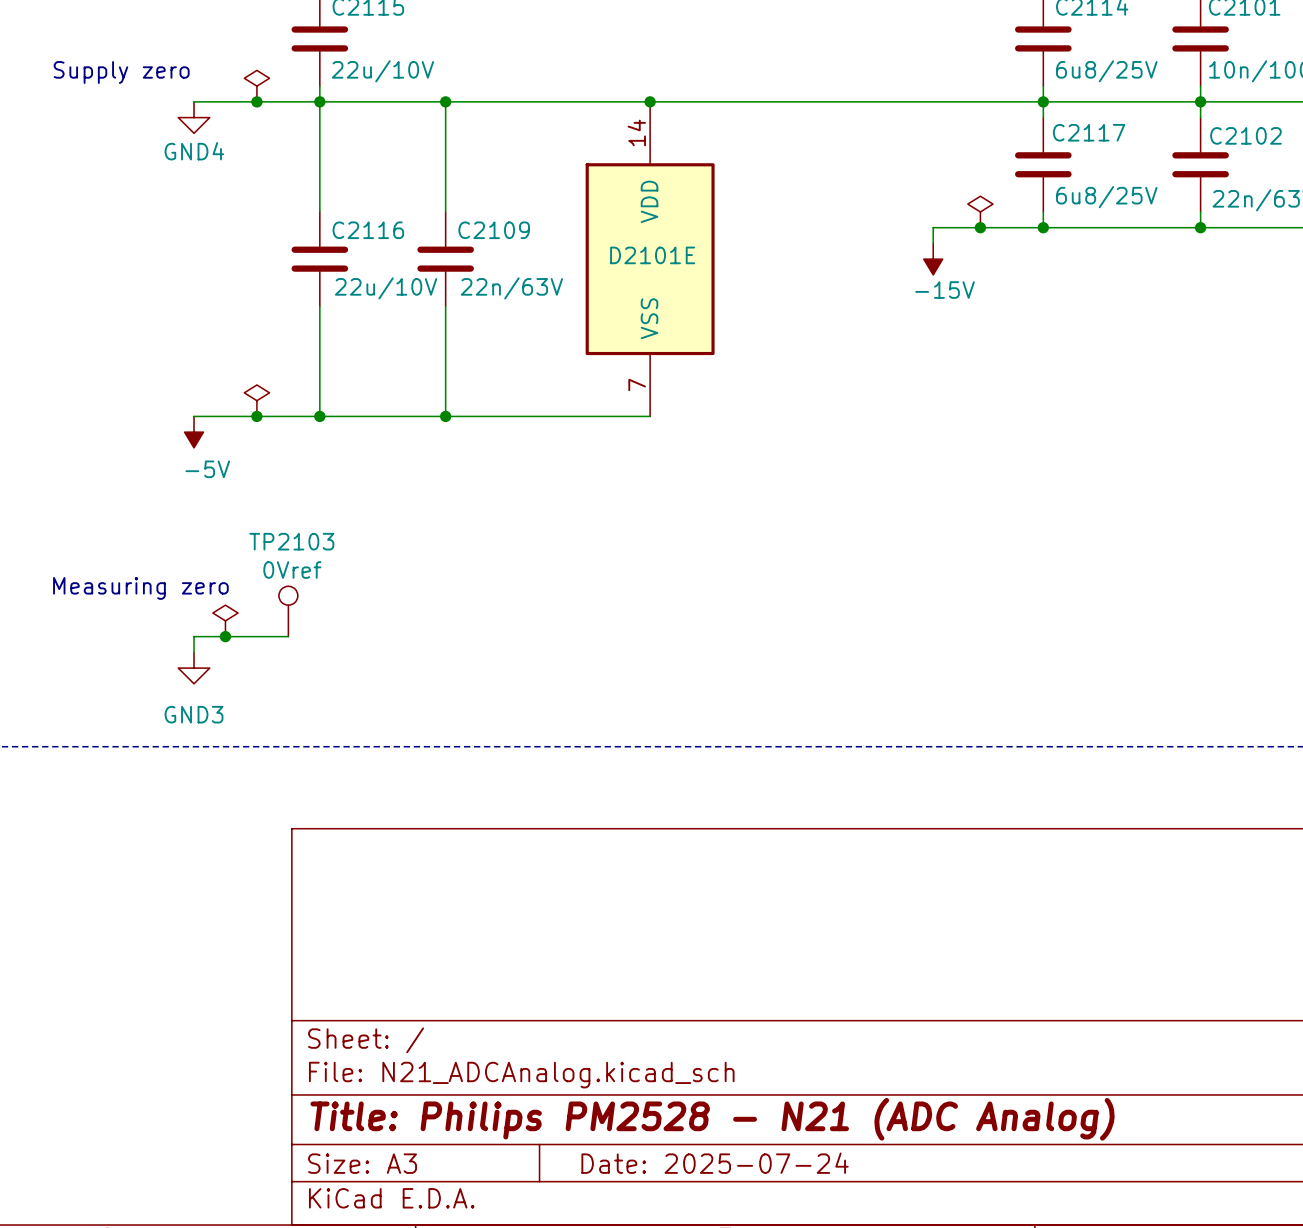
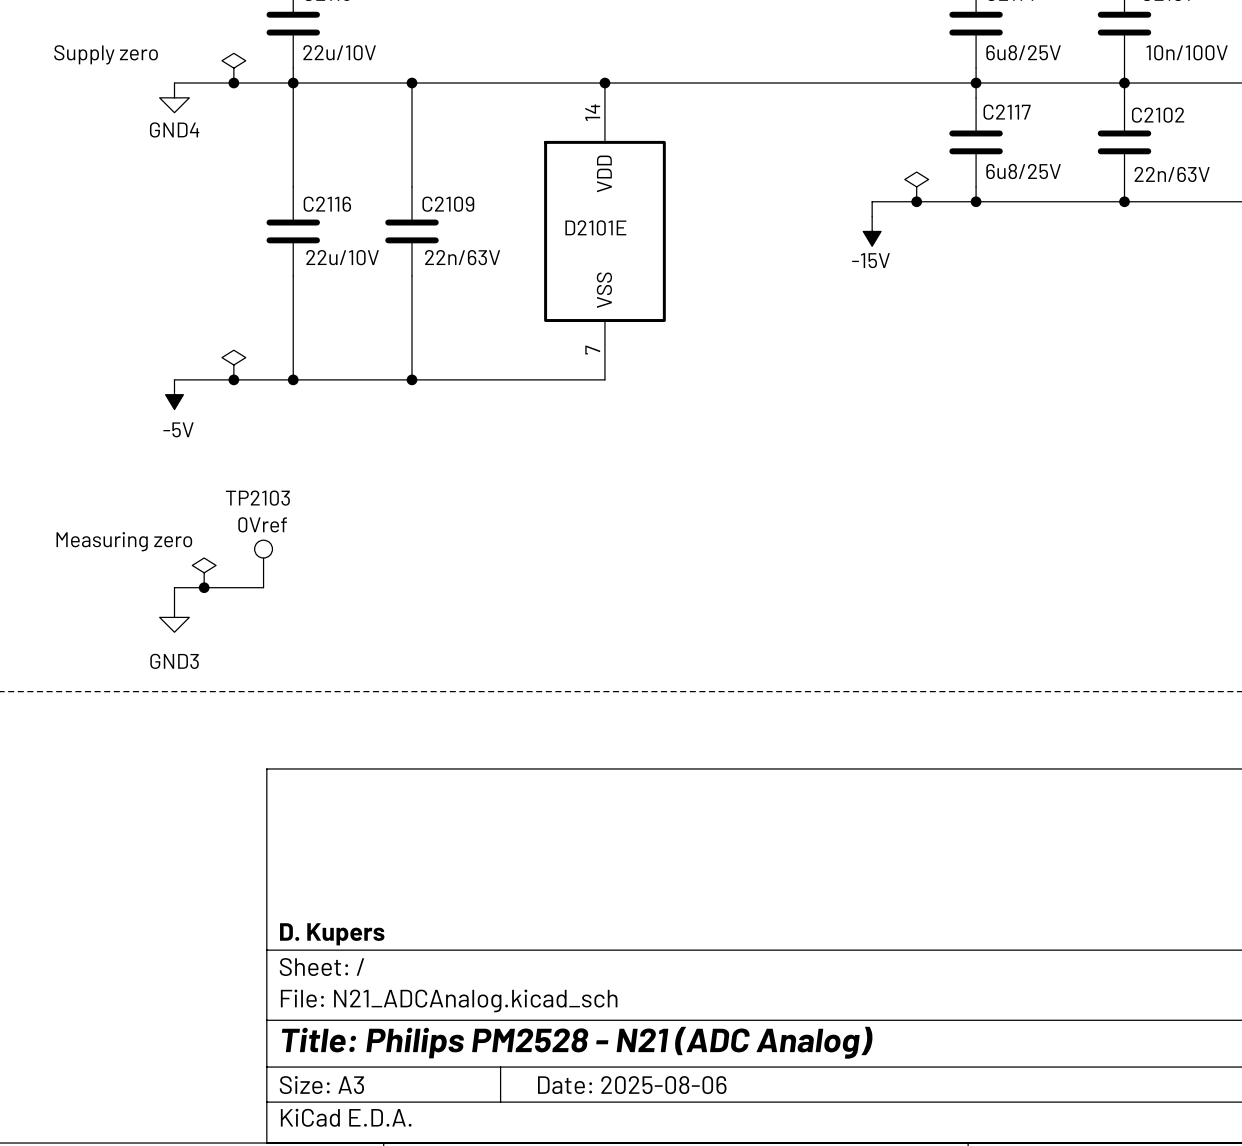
title block: none -> D. Kupers (332, 934)
title block: Date: 2025-07-24 (715, 1163) -> Date: 2025-08-06 (632, 1085)

